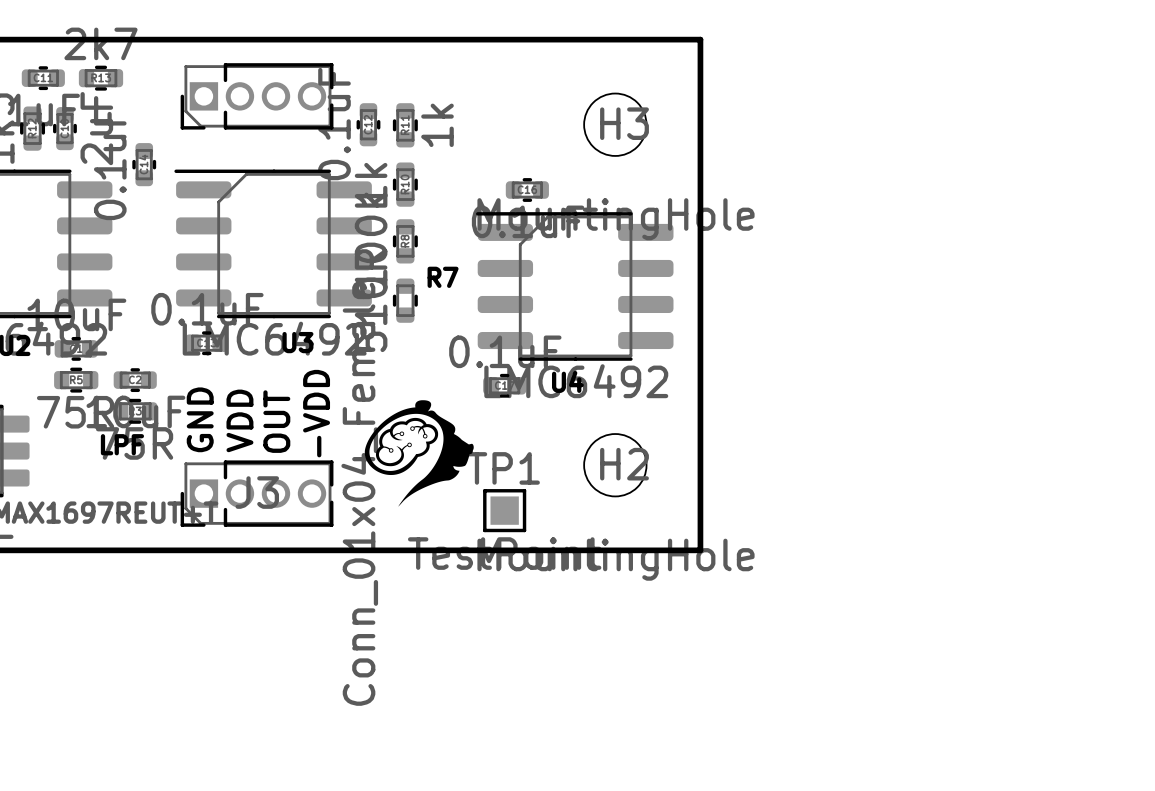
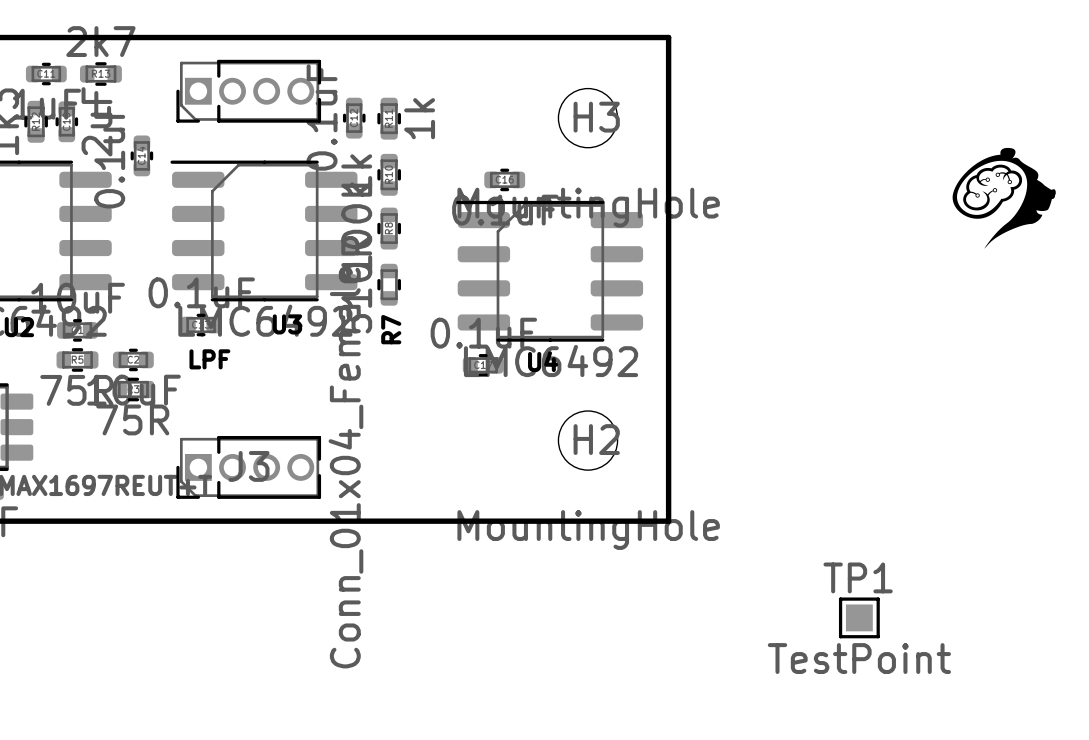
R7 name rotation: 0° (443, 277) -> 90° counterclockwise (391, 329)
R7 name position: R7 (443, 277) -> R7 (391, 329)
text: -VDD (316, 413) -> none
text: GND (200, 419) -> none
text: VDD (239, 420) -> none
text: OUT (276, 421) -> none
text position: LPF (122, 444) -> LPF (209, 359)
drawing position: (419, 453) -> (1004, 198)
TP1 position: (504, 510) -> (859, 617)

